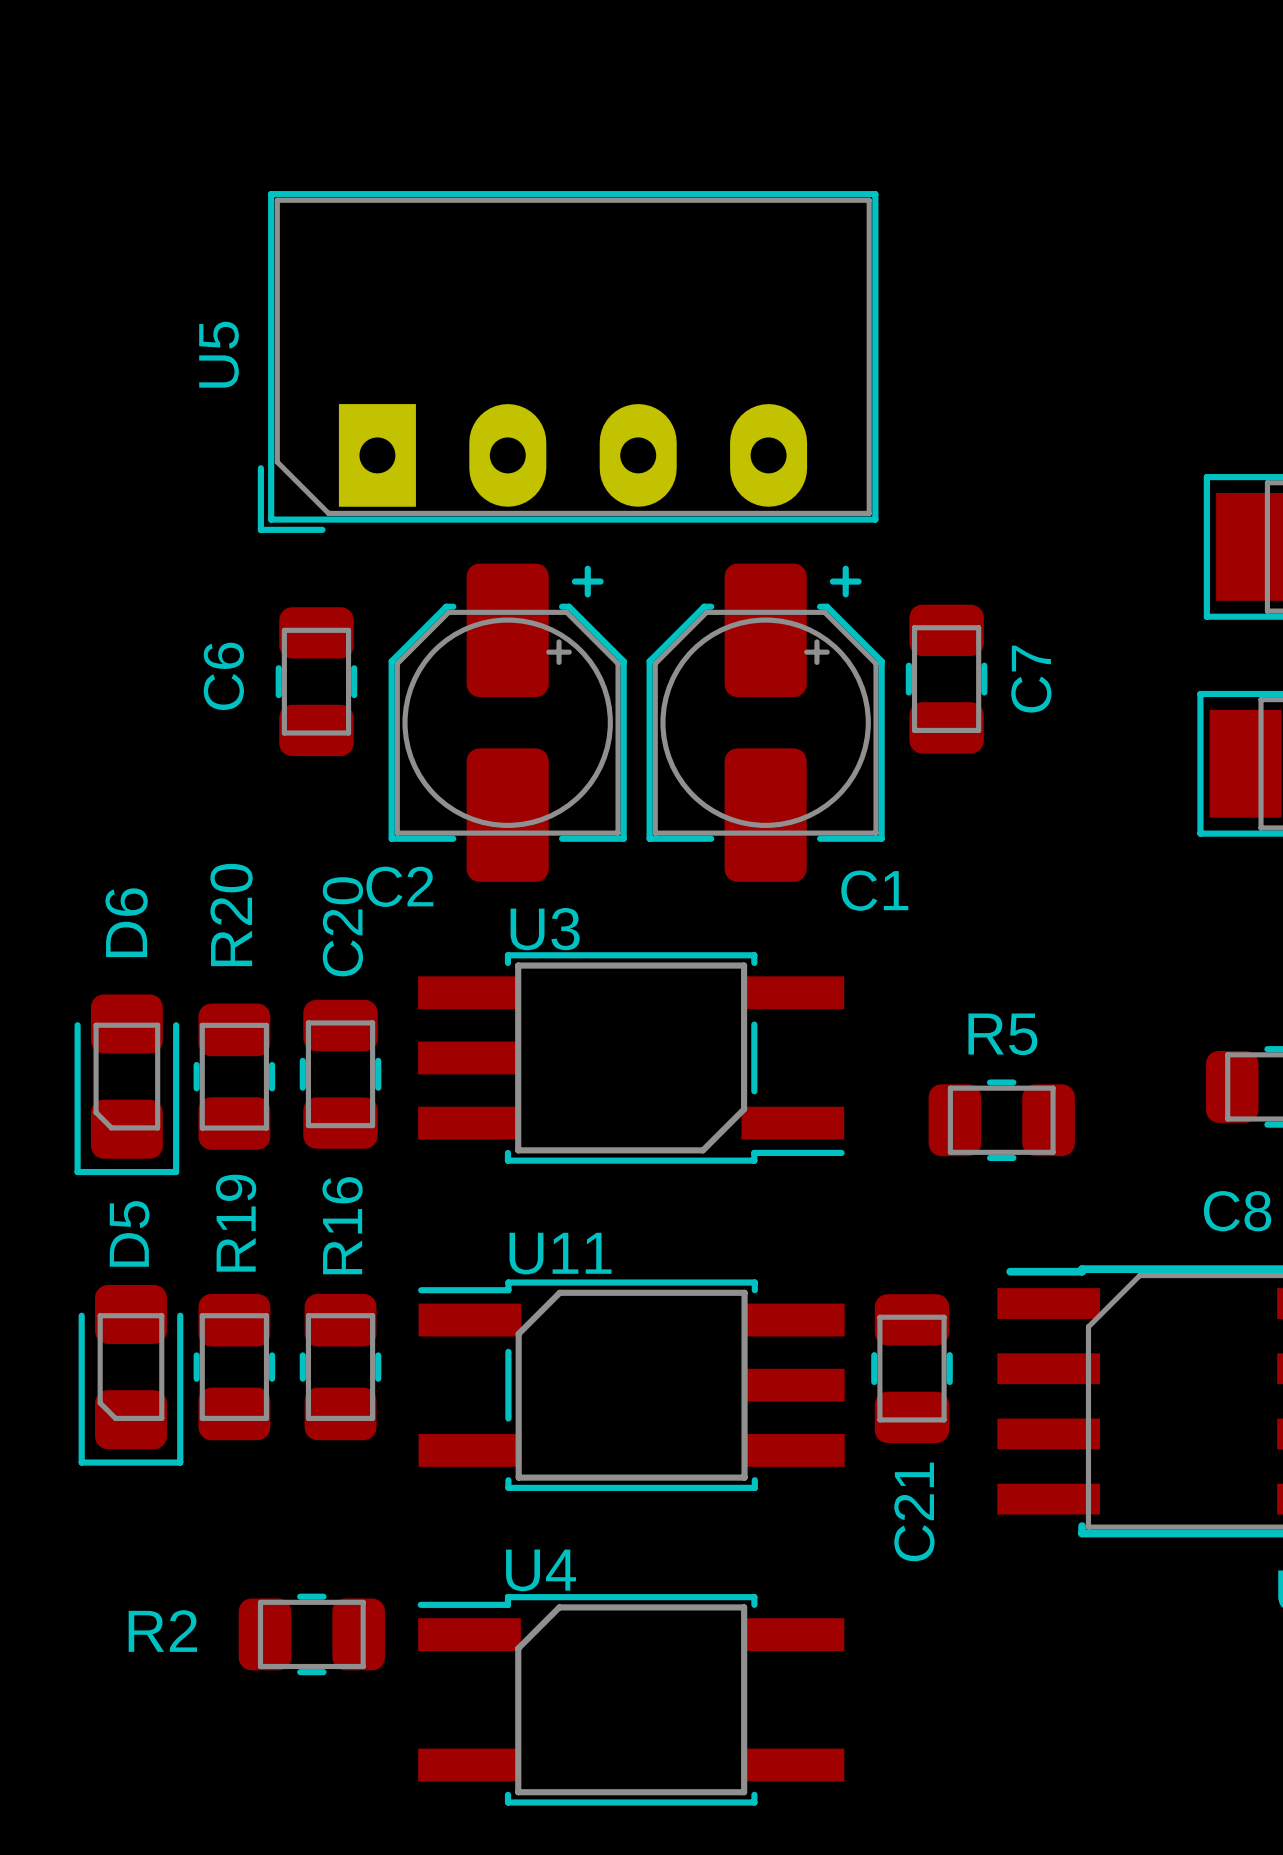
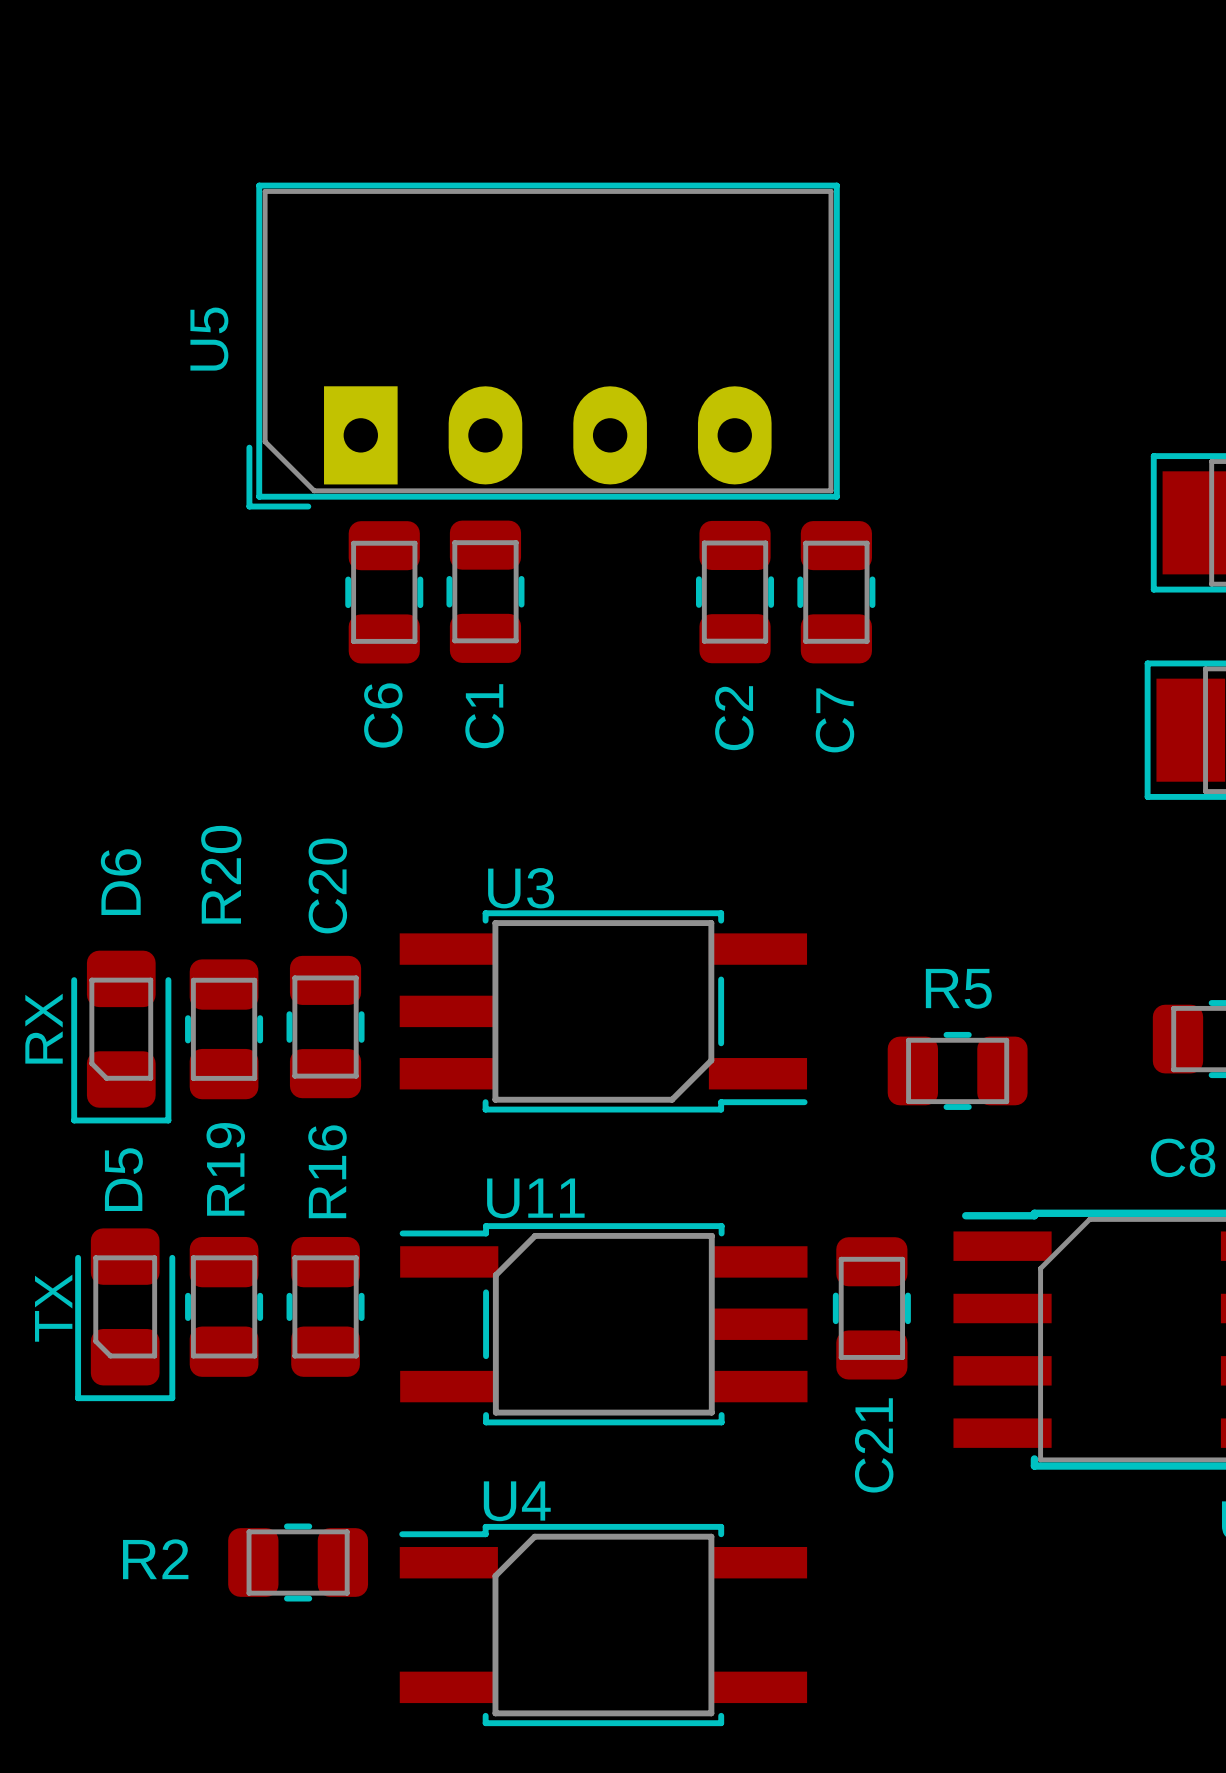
C2 footprint: [388, 563, 627, 882] -> [696, 520, 775, 664]
C1 footprint: [646, 563, 885, 882] -> [446, 520, 525, 663]
C6 name position: C6 (223, 676) -> C6 (383, 715)
C7 position: (946, 679) -> (836, 592)
C7 name position: C7 (1031, 679) -> C7 (834, 720)
C6 position: (316, 681) -> (384, 592)
C2 name position: C2 (399, 886) -> C2 (734, 718)
C1 name position: C1 (874, 890) -> C1 (484, 716)
text: none -> RX (44, 1028)
text: none -> TX (53, 1308)

